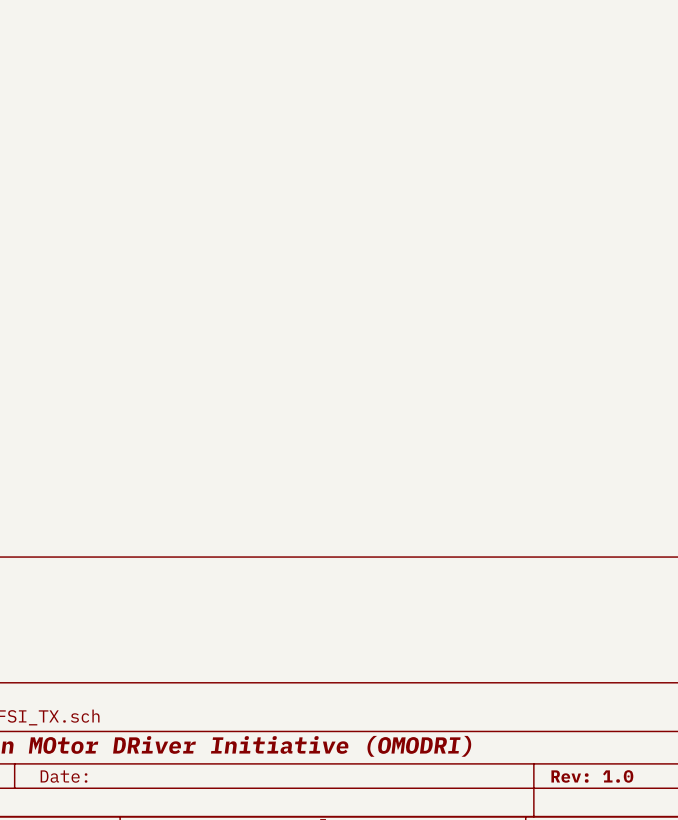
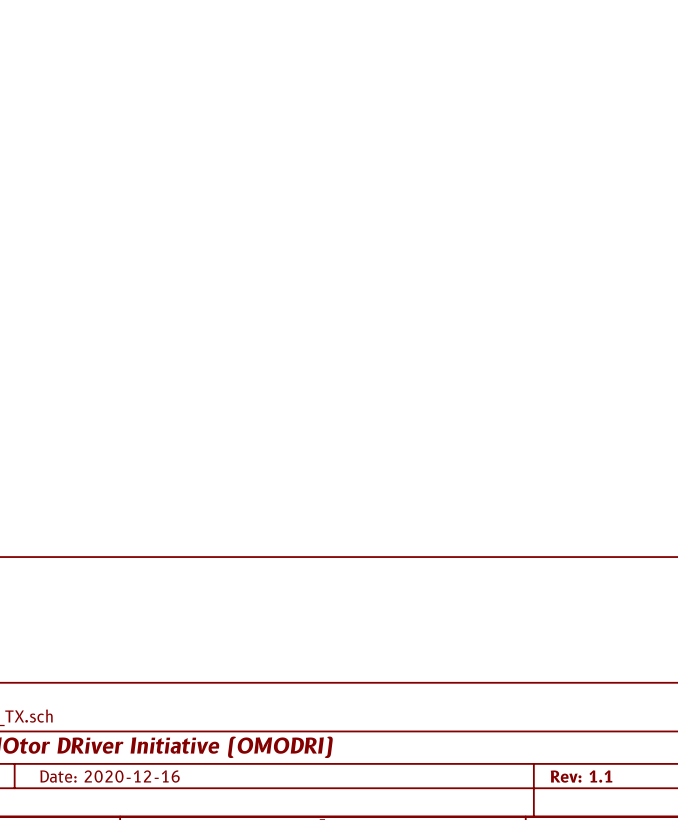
title block: Date: (64, 776) -> Date: 2020-12-16 (110, 776)
title block: Rev: 1.0 (592, 776) -> Rev: 1.1 (581, 776)

